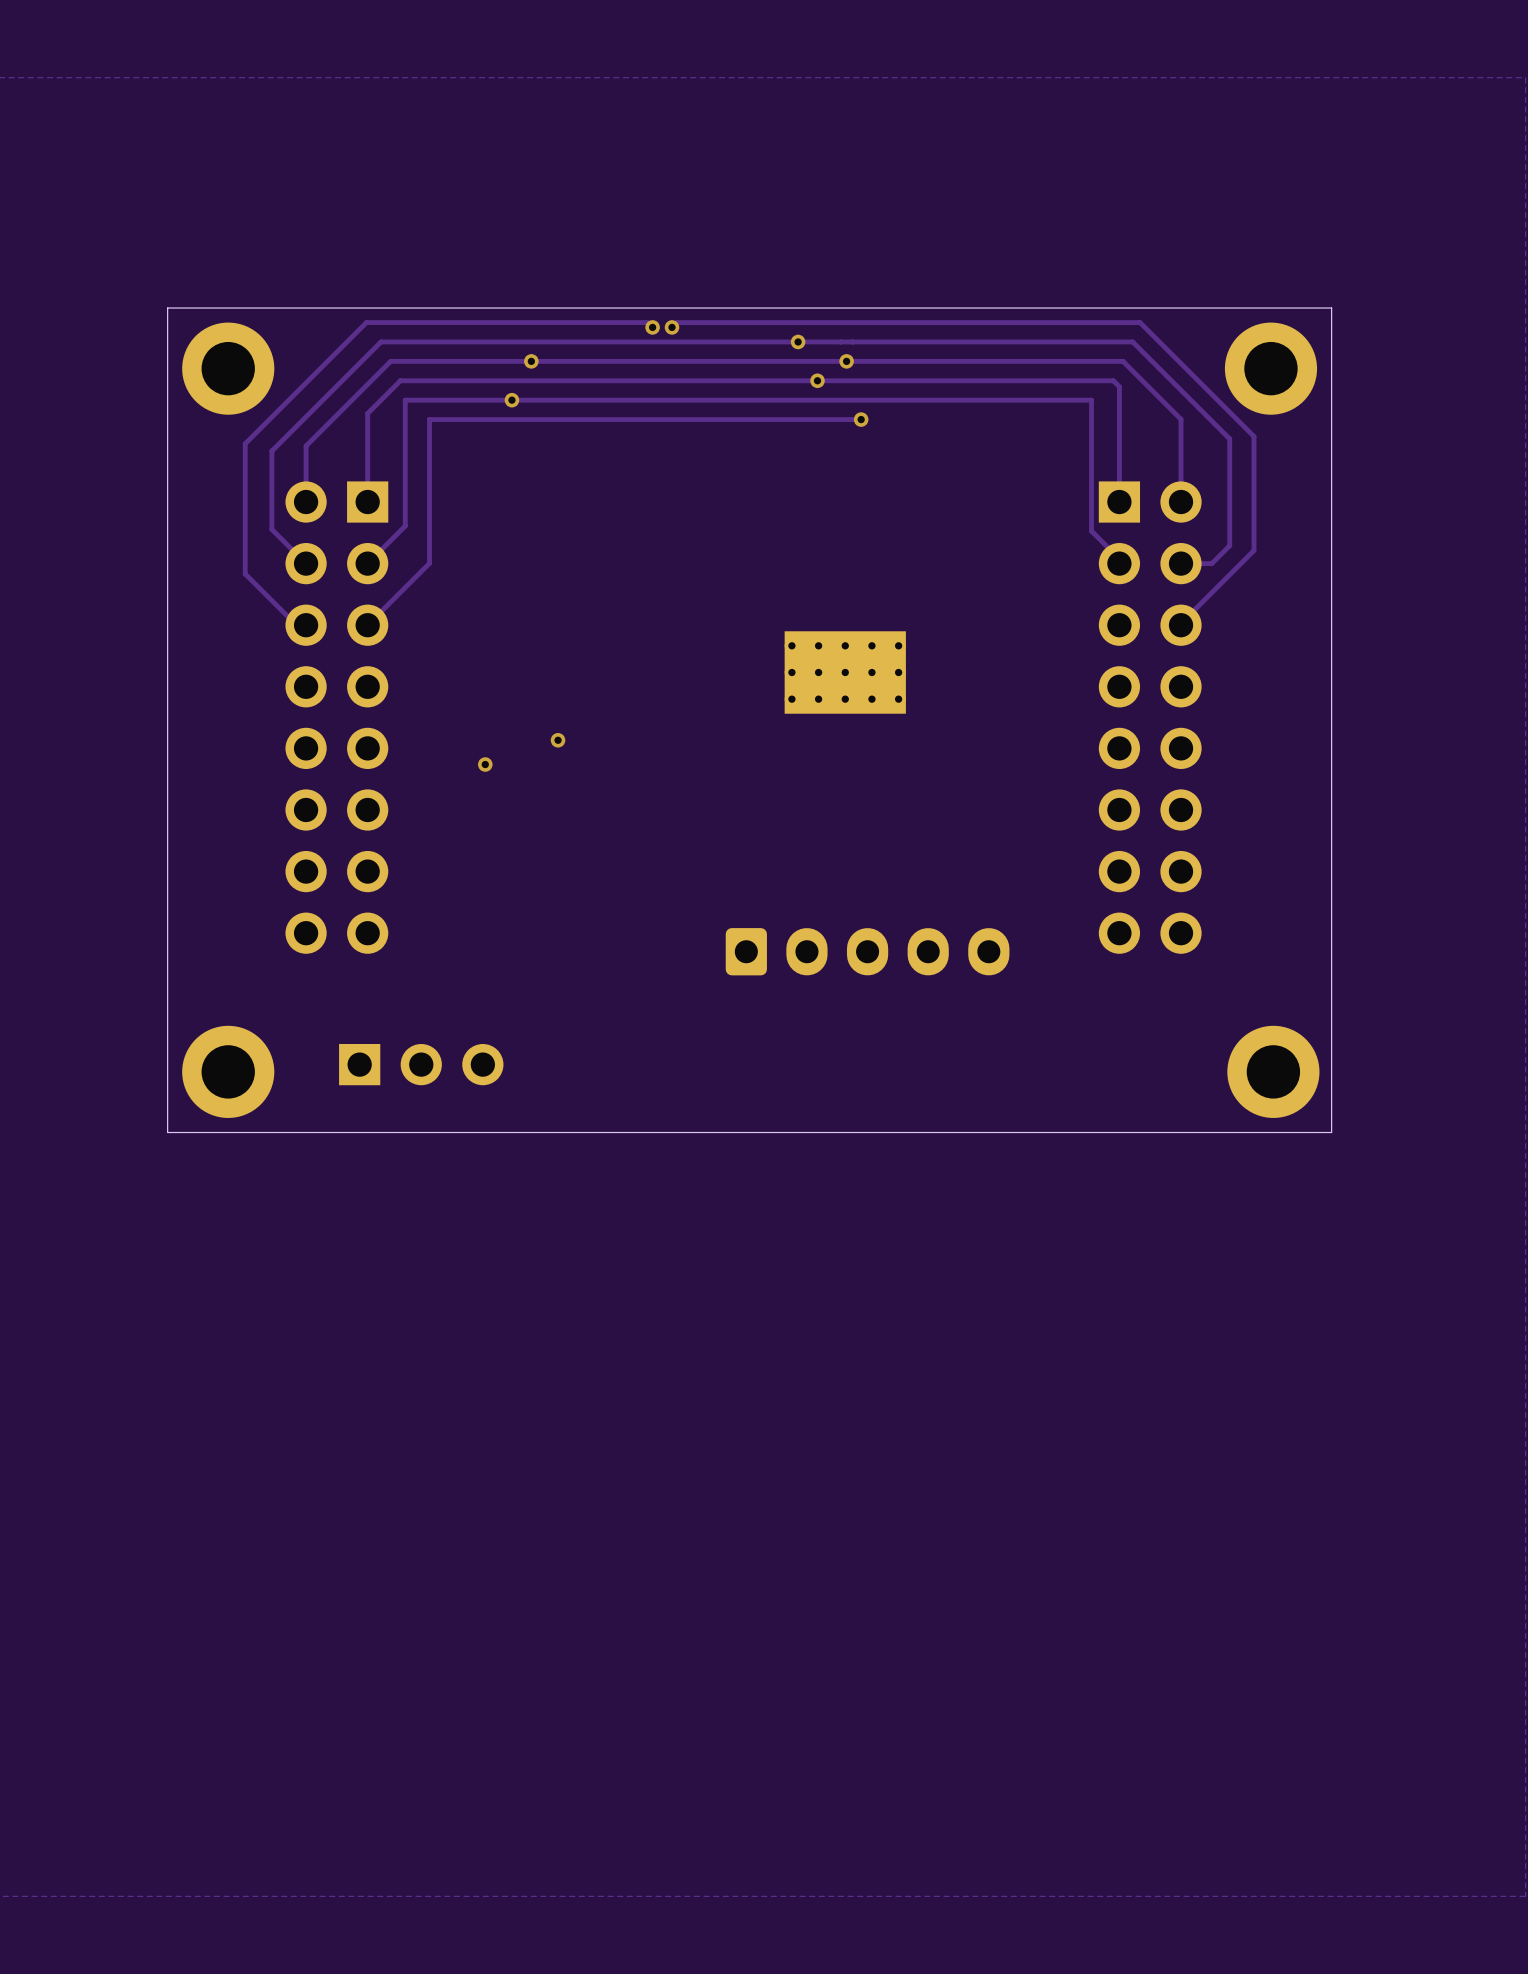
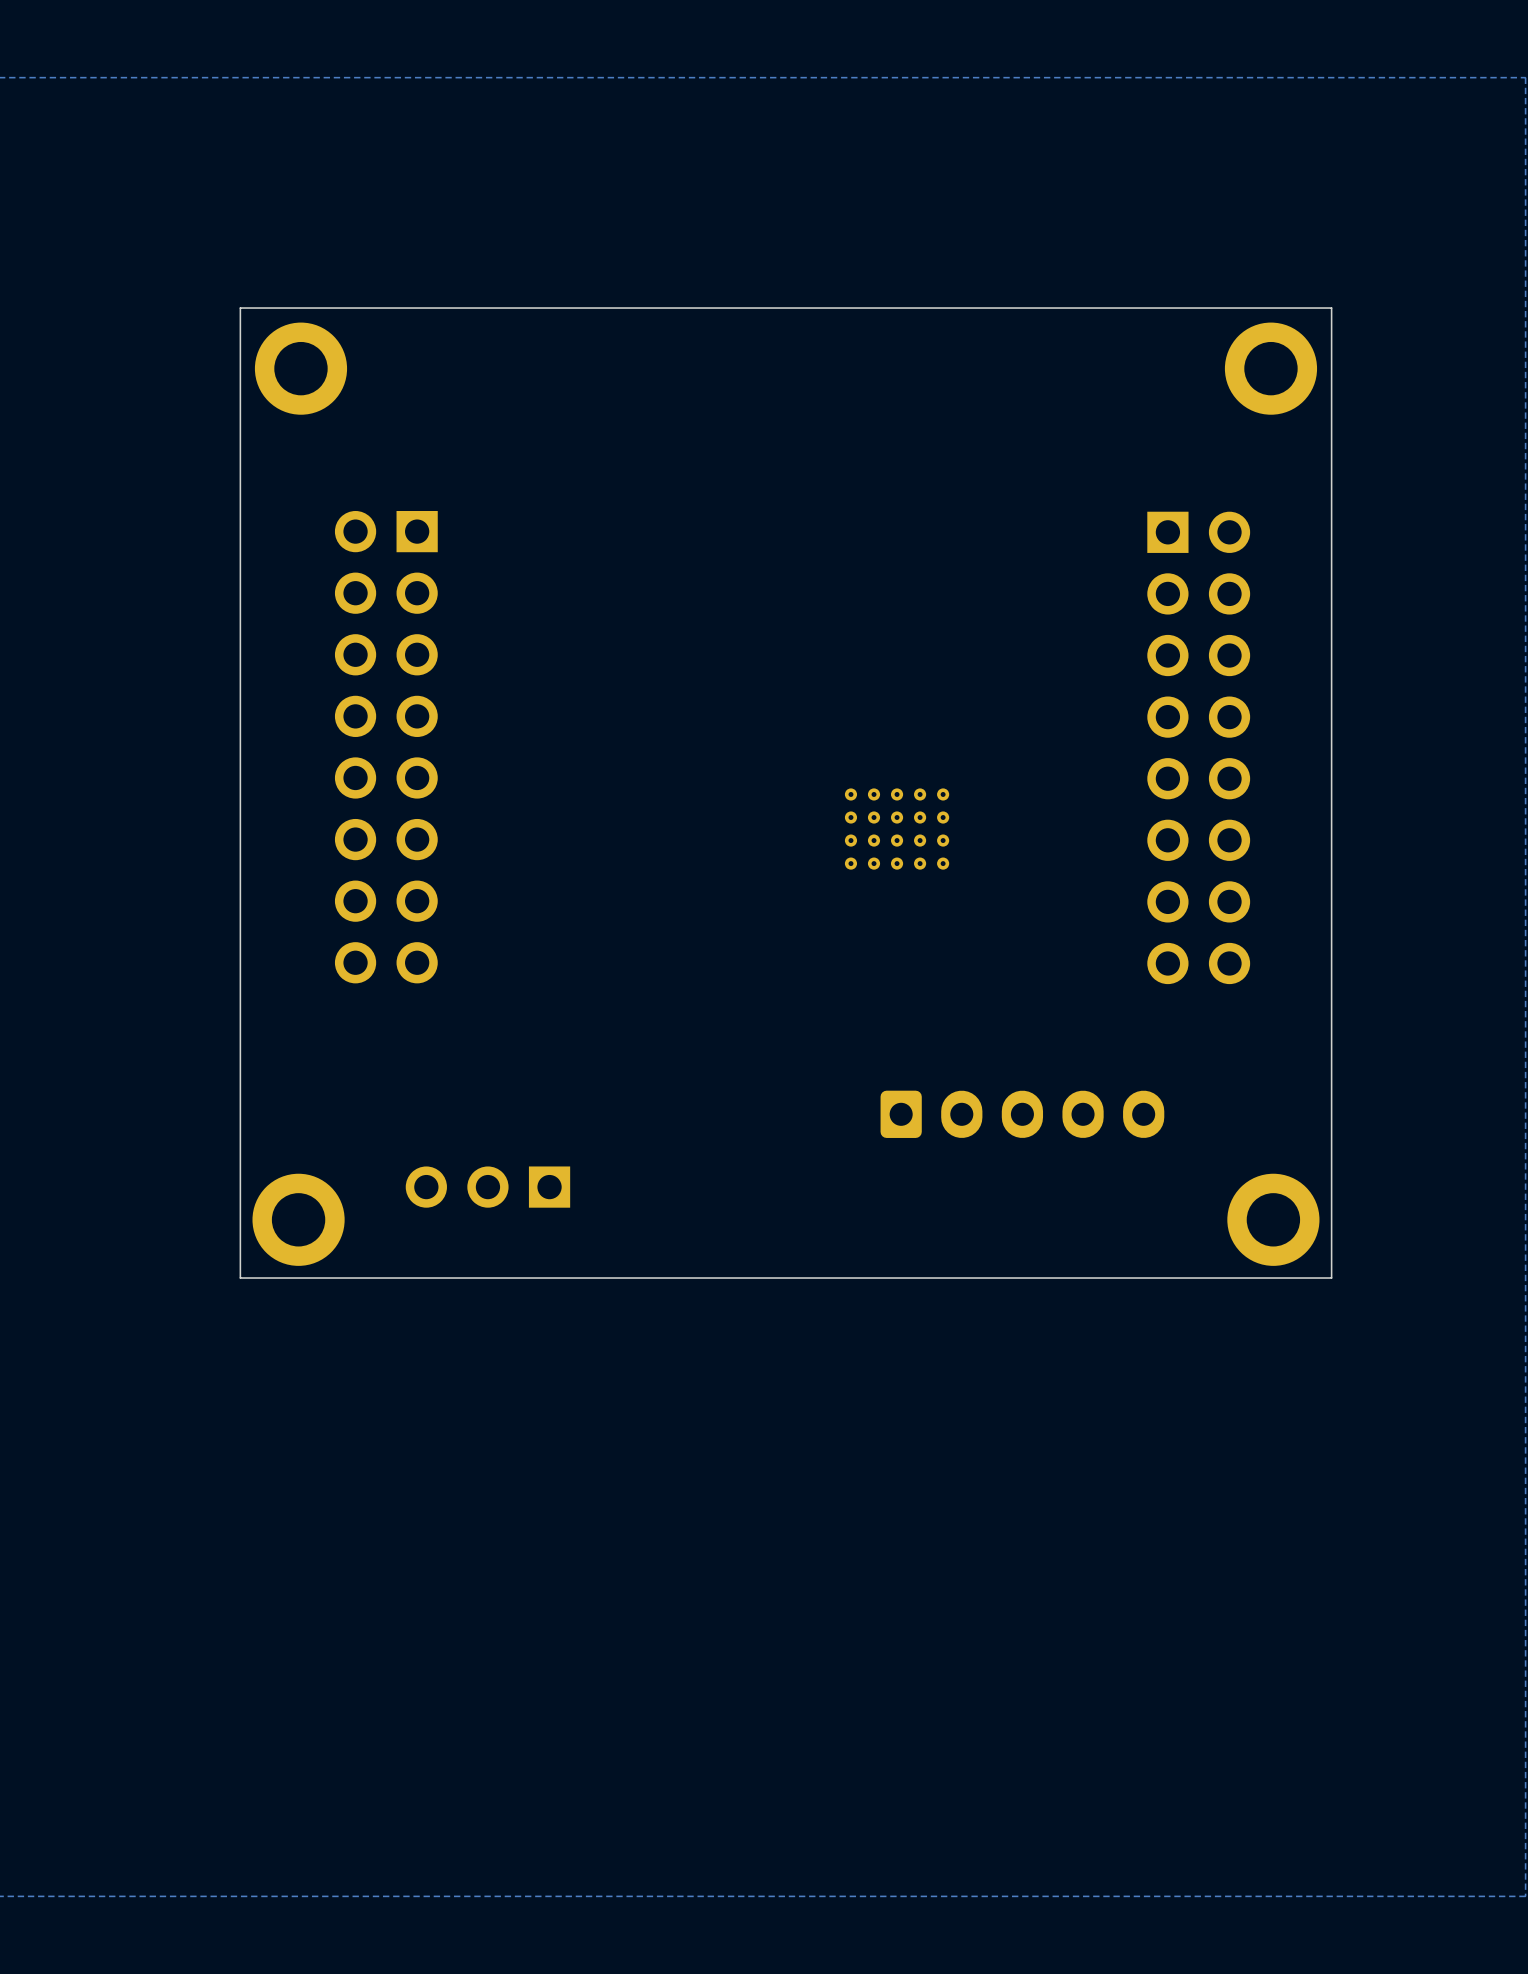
board edge: (240, 308) (167, 308) (167, 1132) (1331, 1132) -> (240, 308) (240, 1278) (1331, 1278) (1331, 1132)
track: (652, 327) (647, 322) (366, 322) (245, 443) (245, 573) (296, 625) (306, 625) -> none
via: (652, 327) -> none
track: (672, 327) (676, 322) (1140, 322) (1254, 436) (1254, 550) (1181, 625) -> none
via: (672, 327) -> none
via: (798, 341) -> none
via: (531, 361) -> none
via: (846, 361) -> none
part position: (228, 368) -> (300, 368)
via: (817, 380) -> none
via: (511, 400) -> none
track: (861, 419) (429, 419) (429, 563) (367, 625) -> none
via: (861, 419) -> none
track: (1119, 502) (1119, 386) (1113, 380) (400, 380) (367, 413) (367, 502) -> none
track: (1181, 502) (1181, 419) (1123, 361) (390, 361) (306, 446) (306, 502) -> none
track: (1119, 563) (1119, 559) (1091, 531) (1091, 400) (405, 400) (405, 526) (367, 563) -> none
track: (1181, 563) (1211, 563) (1229, 545) (1229, 438) (1132, 341) (381, 341) (271, 451) (271, 529) (306, 563) -> none
part: (845, 672) -> none
part position: (336, 717) -> (386, 747)
part position: (1150, 717) -> (1198, 747)
via: (558, 740) -> none
via: (485, 764) -> none
part: none -> (897, 829)
part position: (867, 951) -> (1022, 1114)
part rotation: 0° (421, 1064) -> 180° (487, 1187)
part position: (421, 1064) -> (487, 1187)
part position: (228, 1071) -> (298, 1219)
part position: (1273, 1071) -> (1273, 1219)

